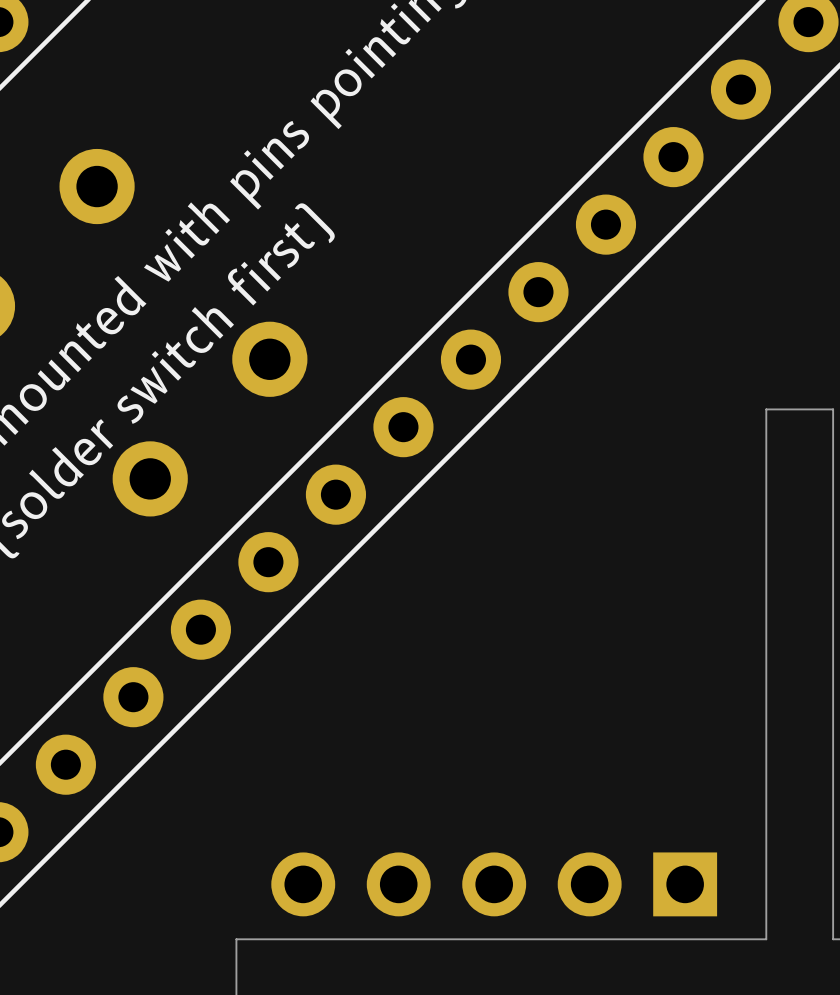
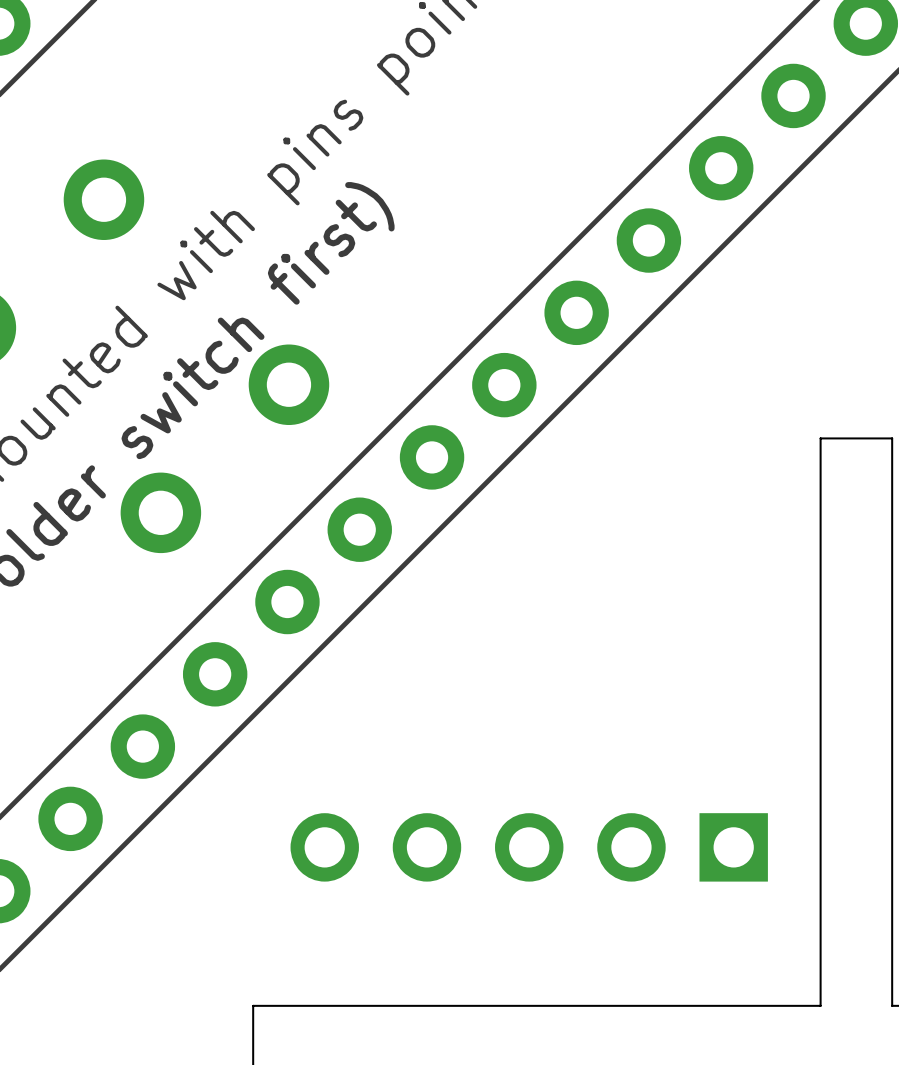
part position: (494, 884) -> (529, 847)

